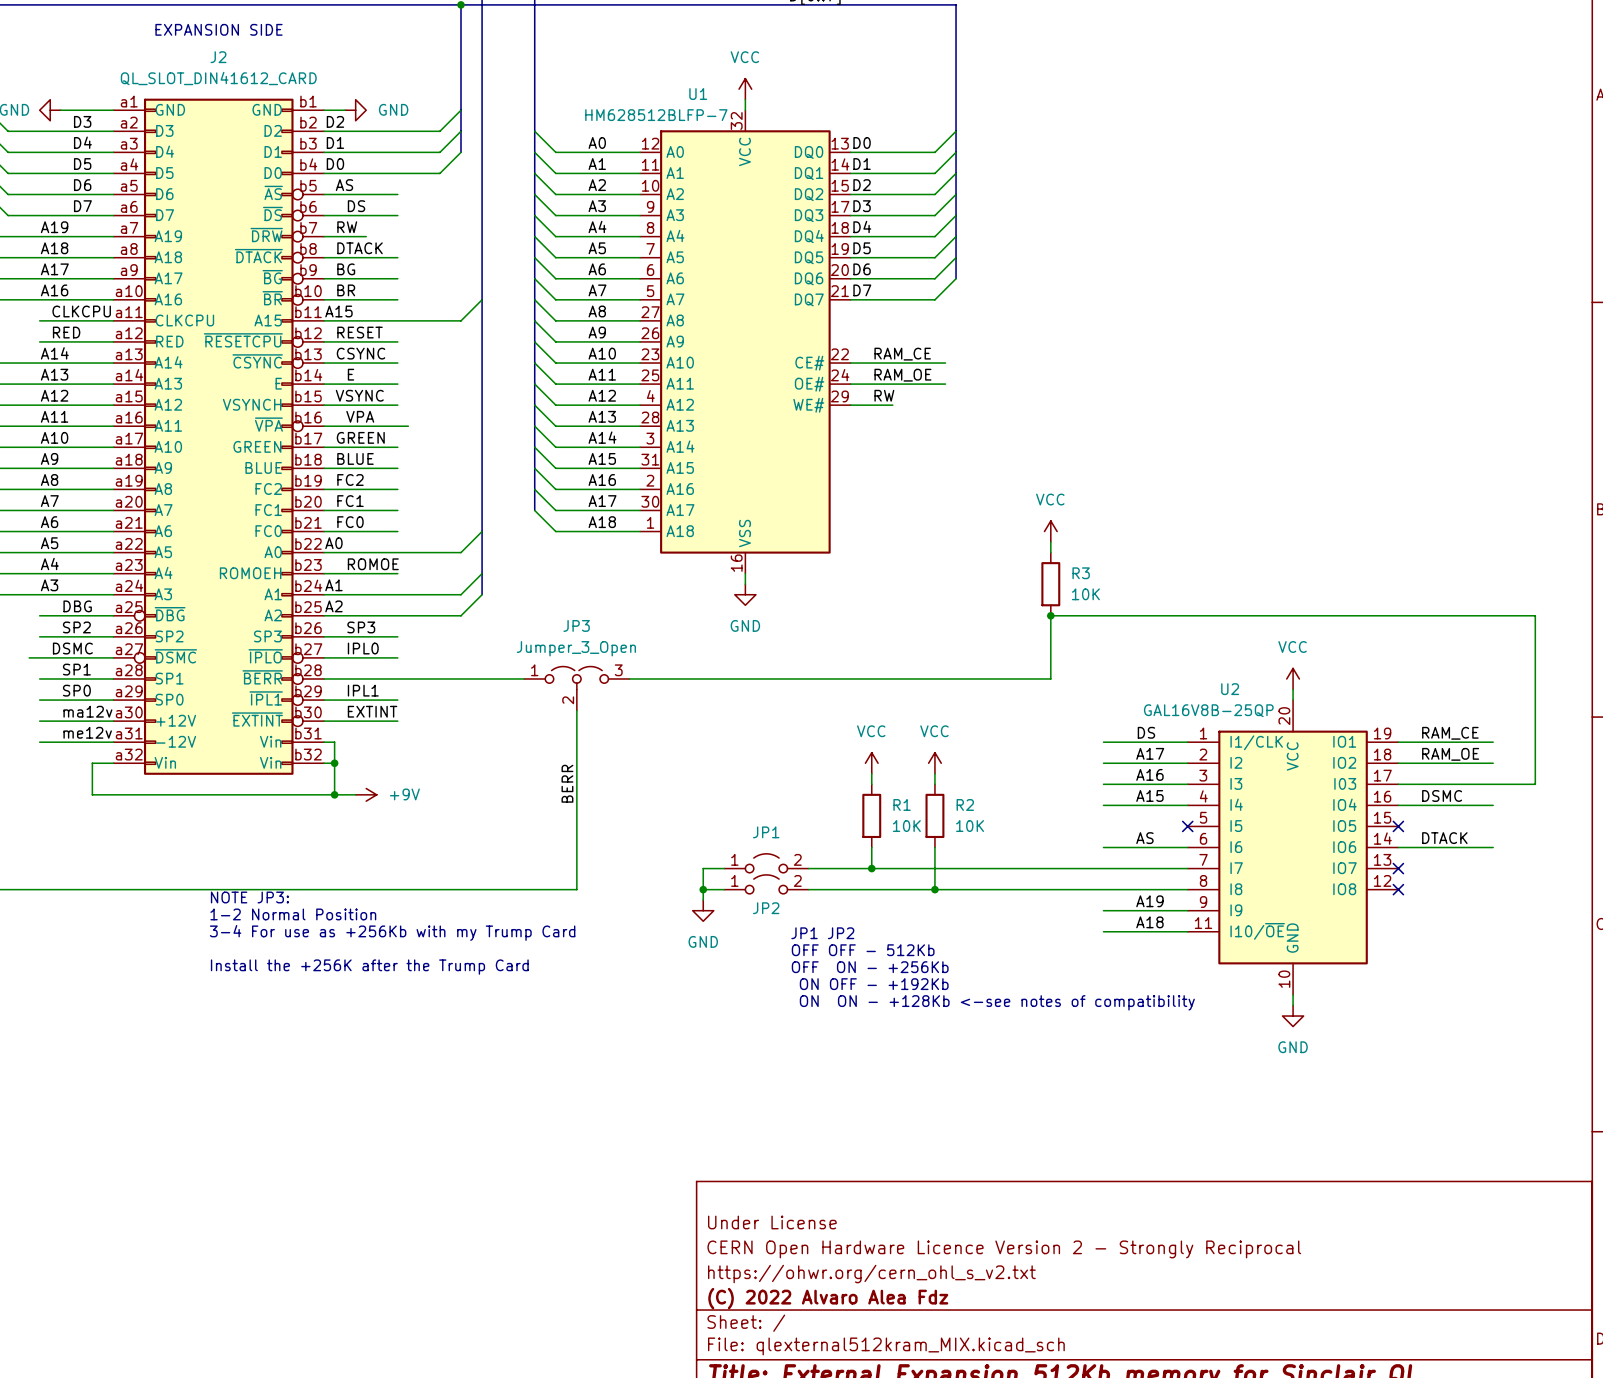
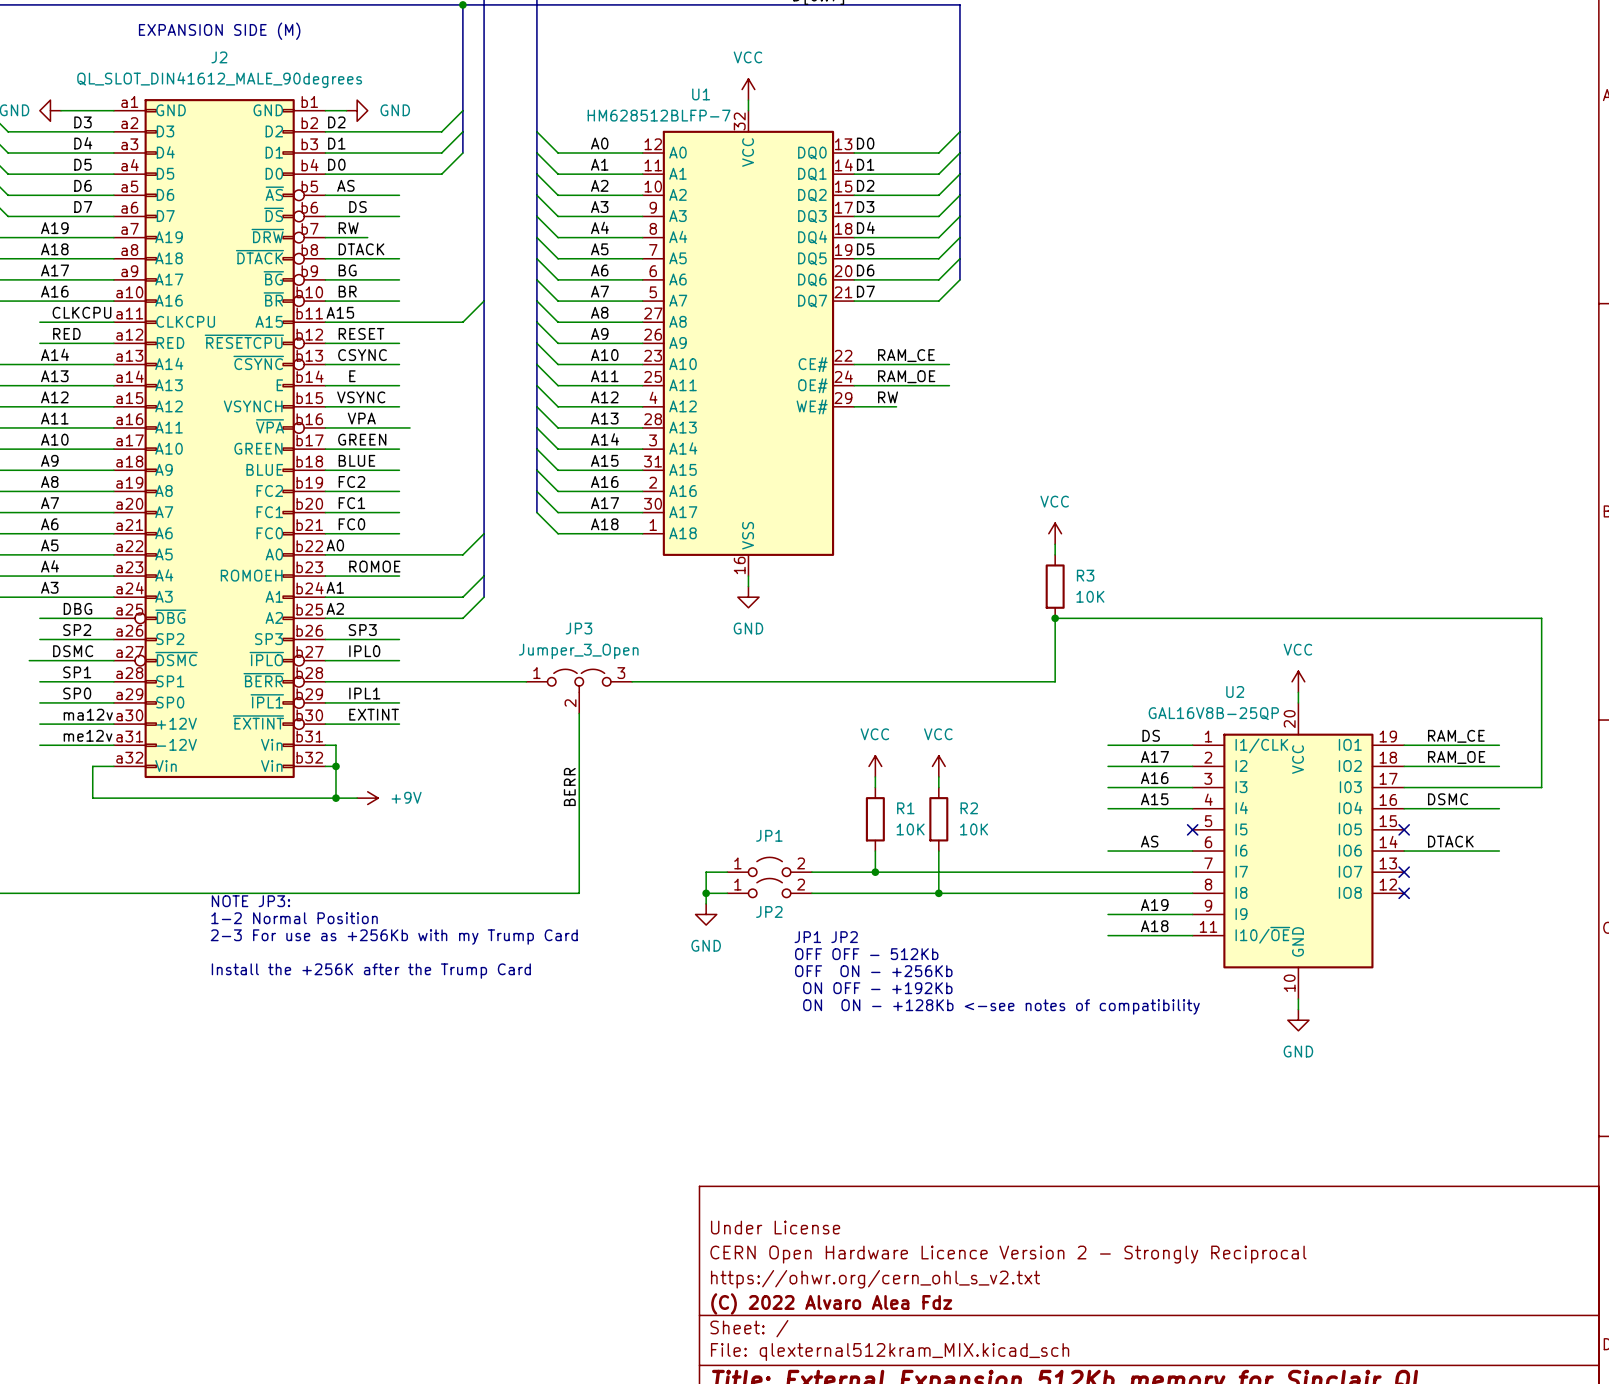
text: EXPANSION SIDE (219, 29) -> EXPANSION SIDE (M) (219, 31)
J2 value: QL_SLOT_DIN41612_CARD (218, 78) -> QL_SLOT_DIN41612_MALE_90degrees (219, 80)
text: 3-4 For use as +256Kb with my Trump Card (392, 932) -> 2-3 For use as +256Kb with my Trump Card (394, 937)

